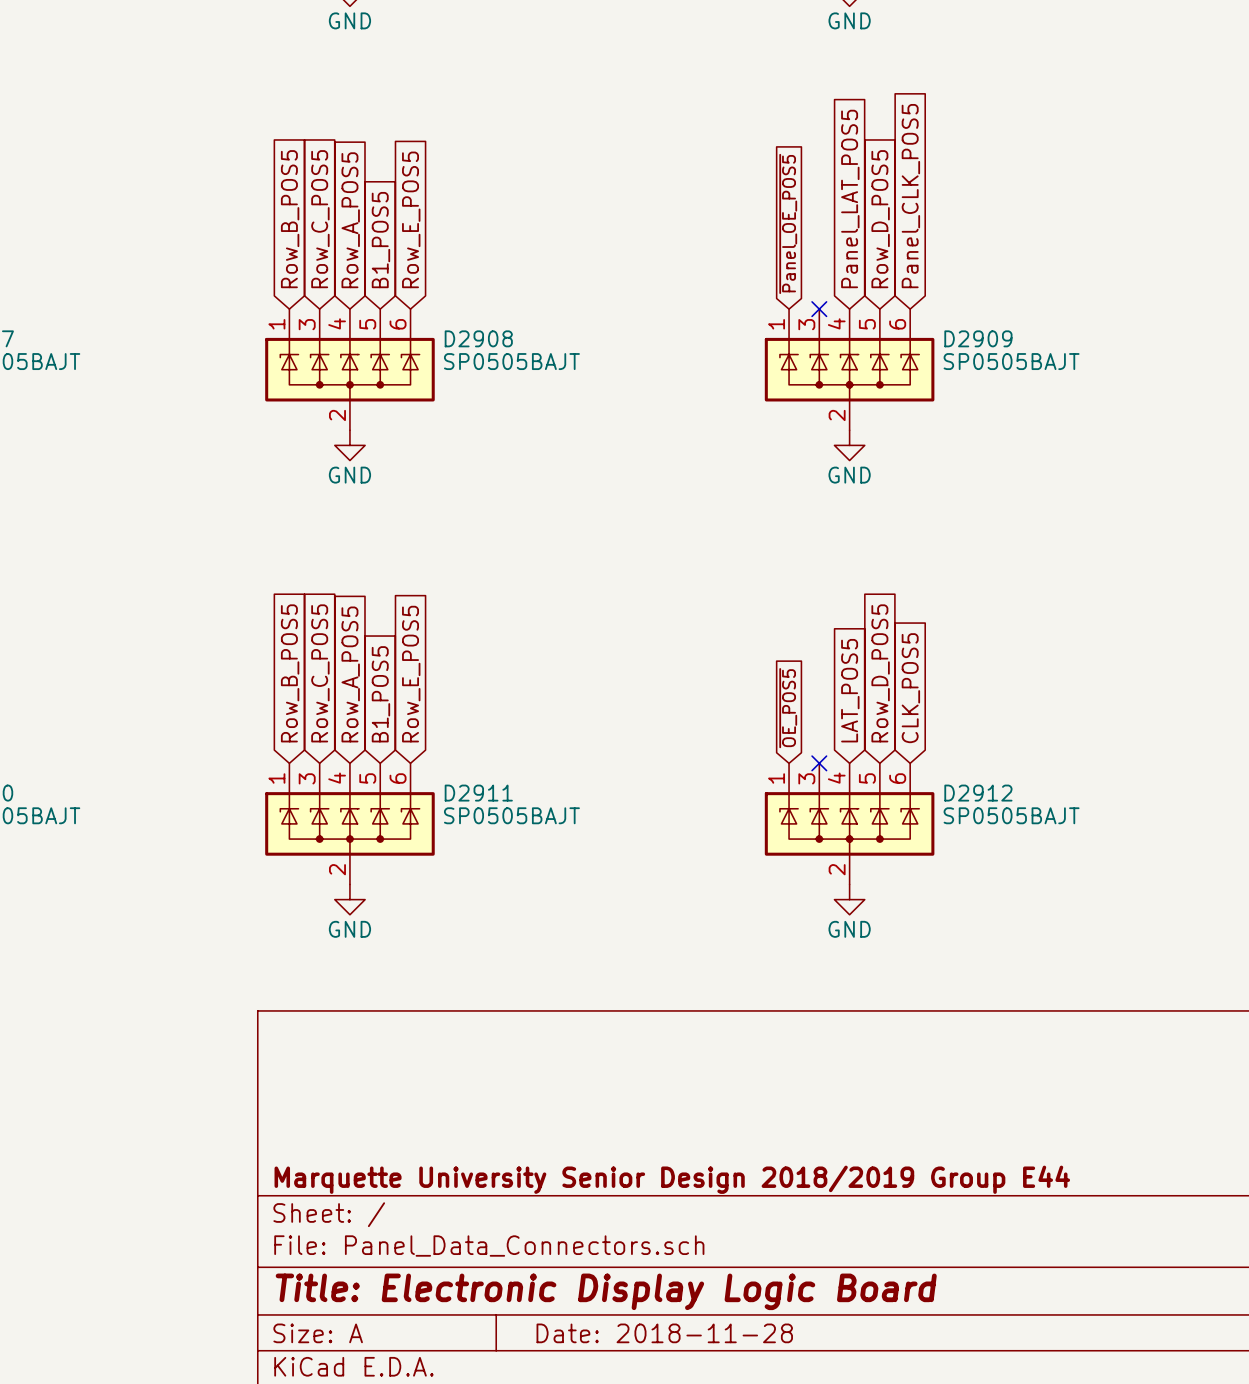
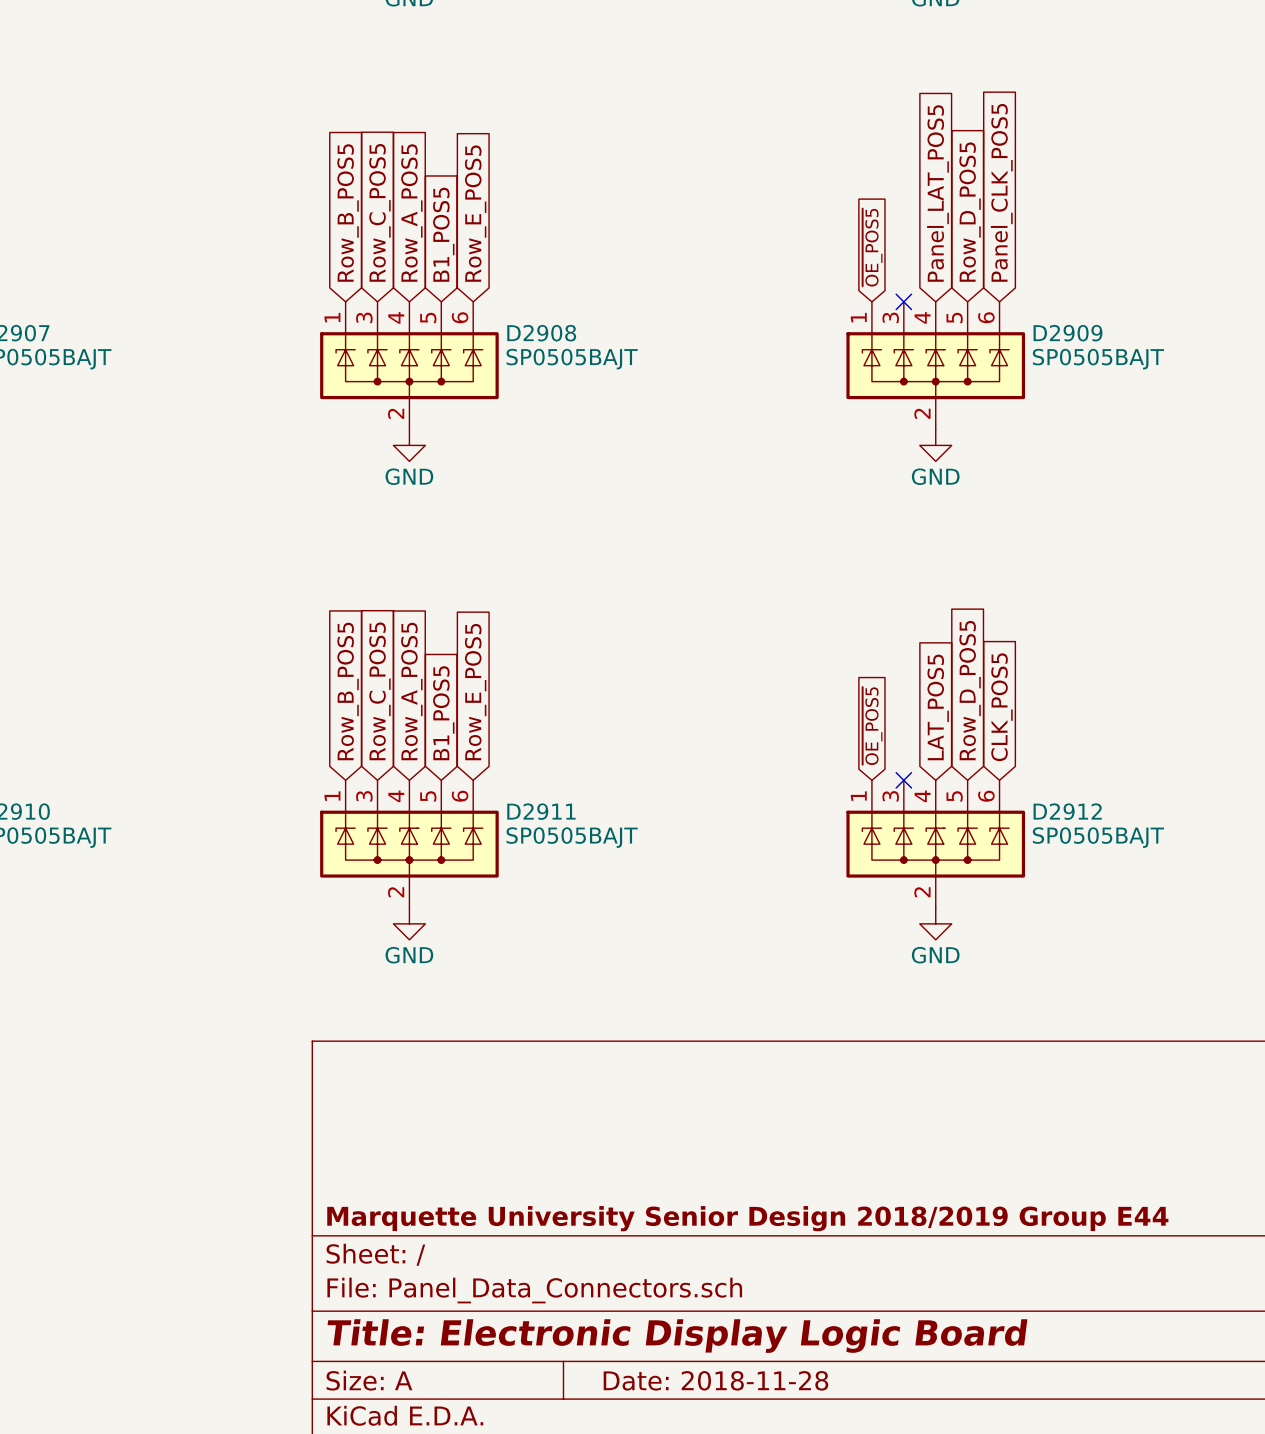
global label: ~{Panel_OE_POS5} (788, 223) -> ~{OE_POS5} (872, 247)

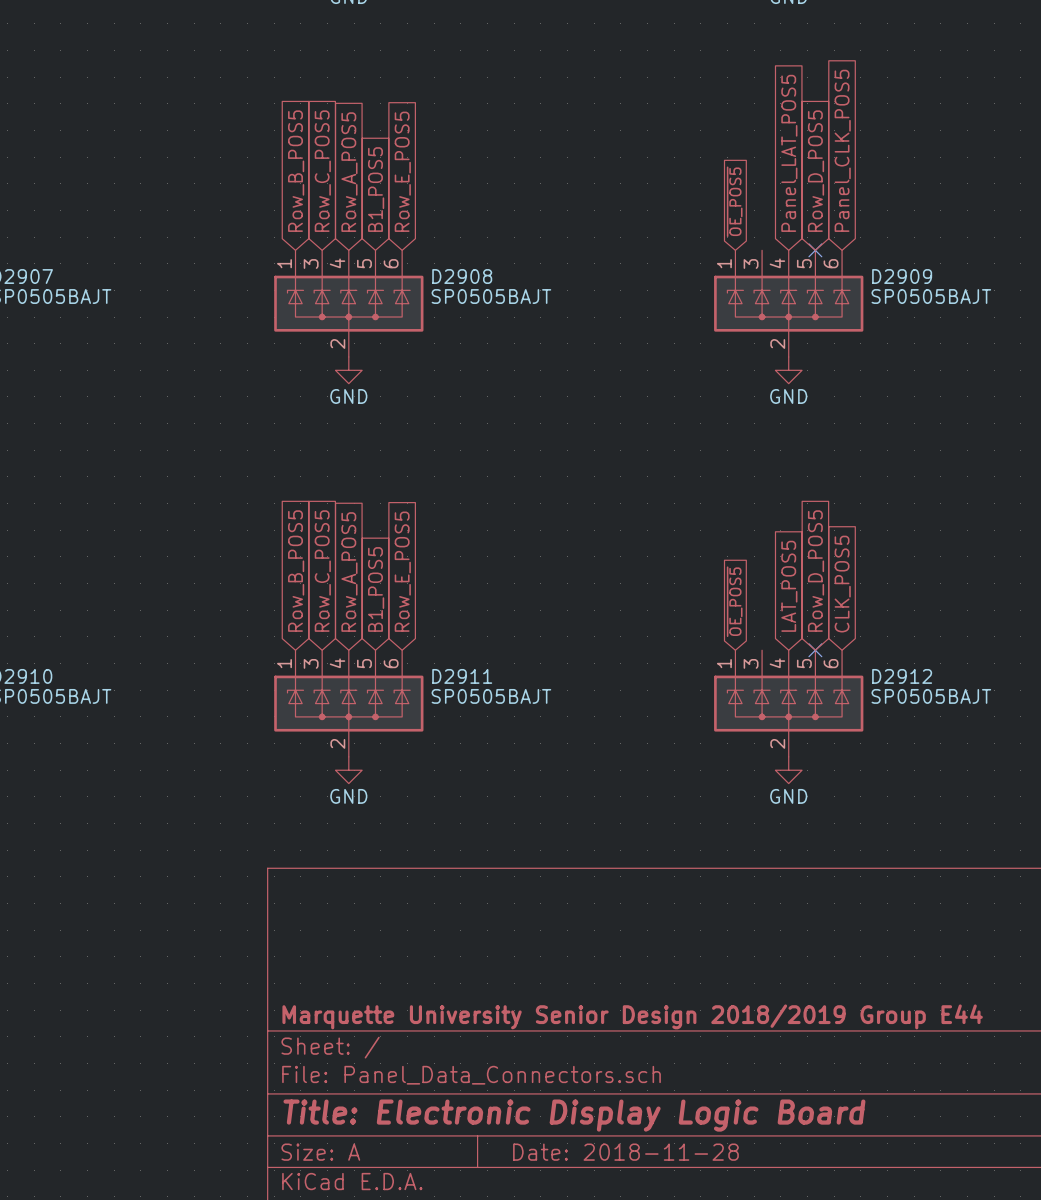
no-connect mark position: (903, 301) -> (815, 250)
no-connect mark position: (903, 780) -> (815, 650)

